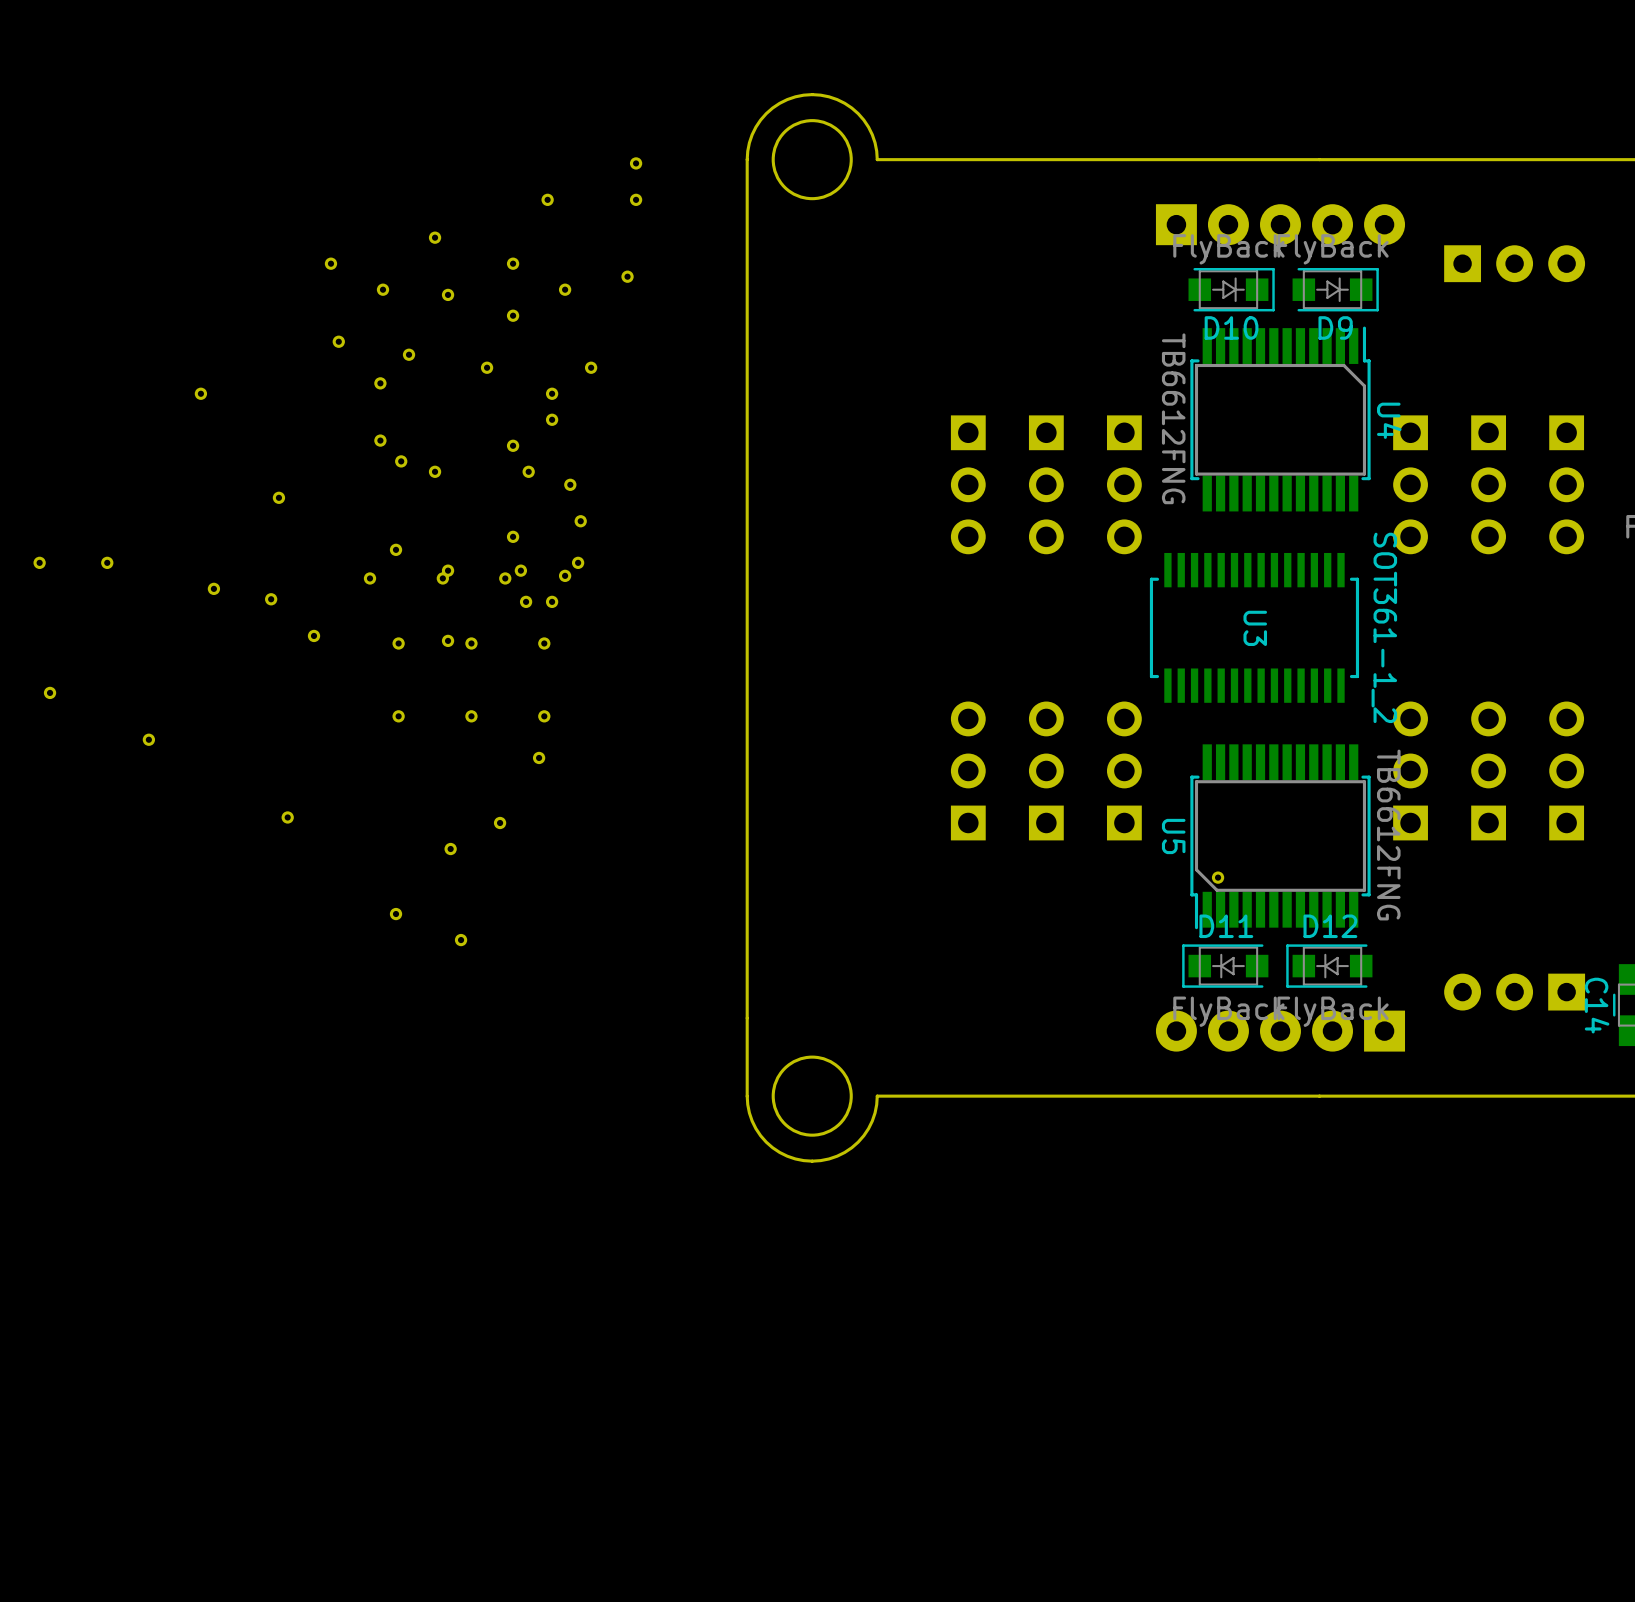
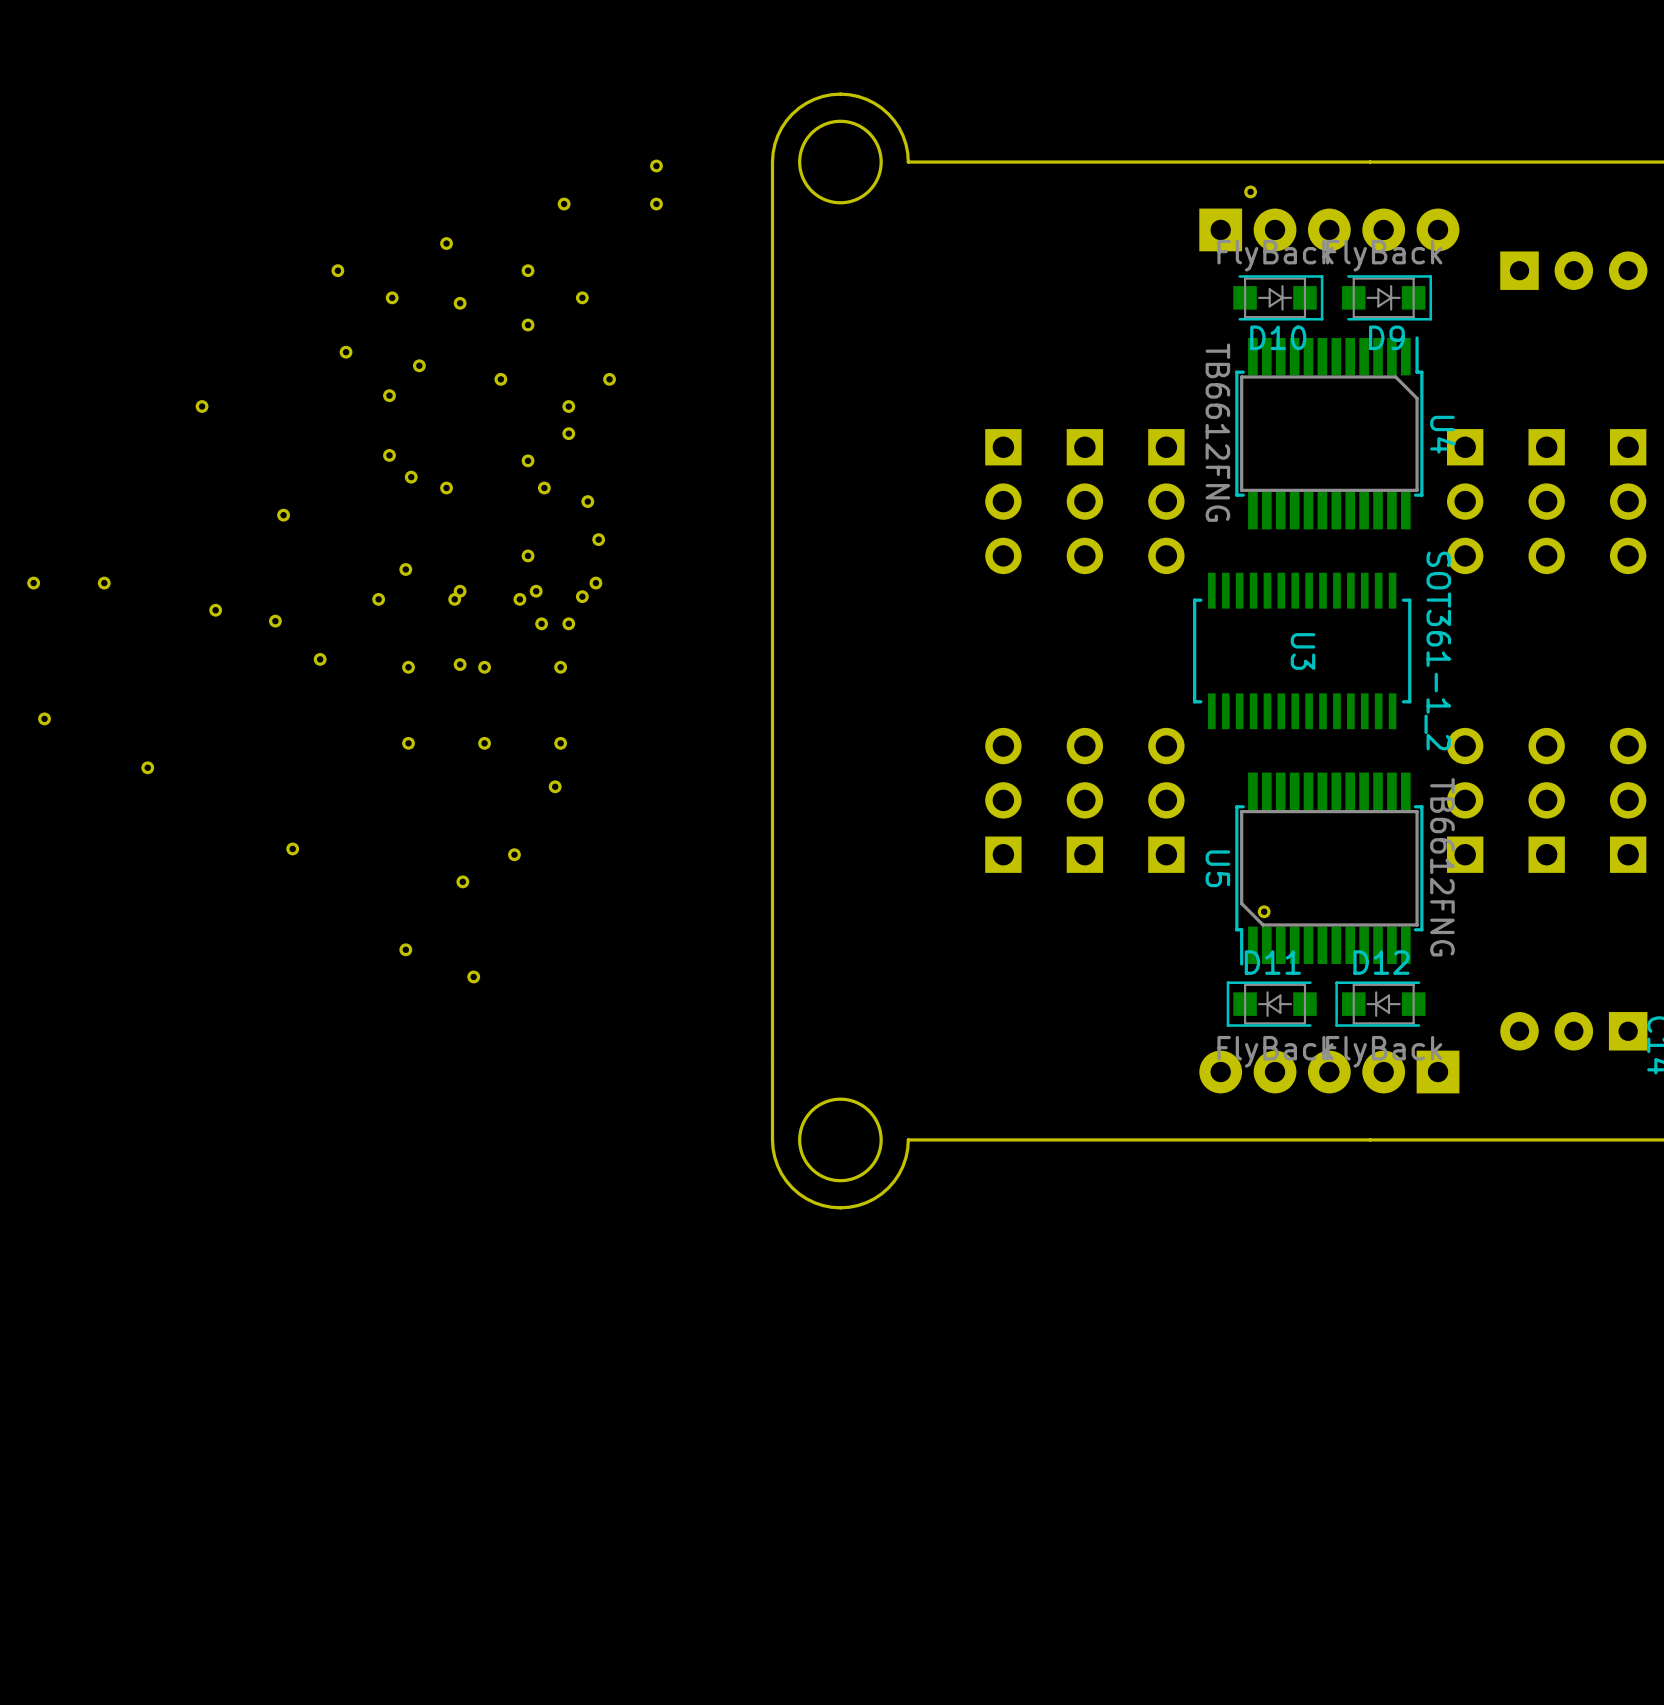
part: none -> (1250, 191)
part: (627, 276) -> none

